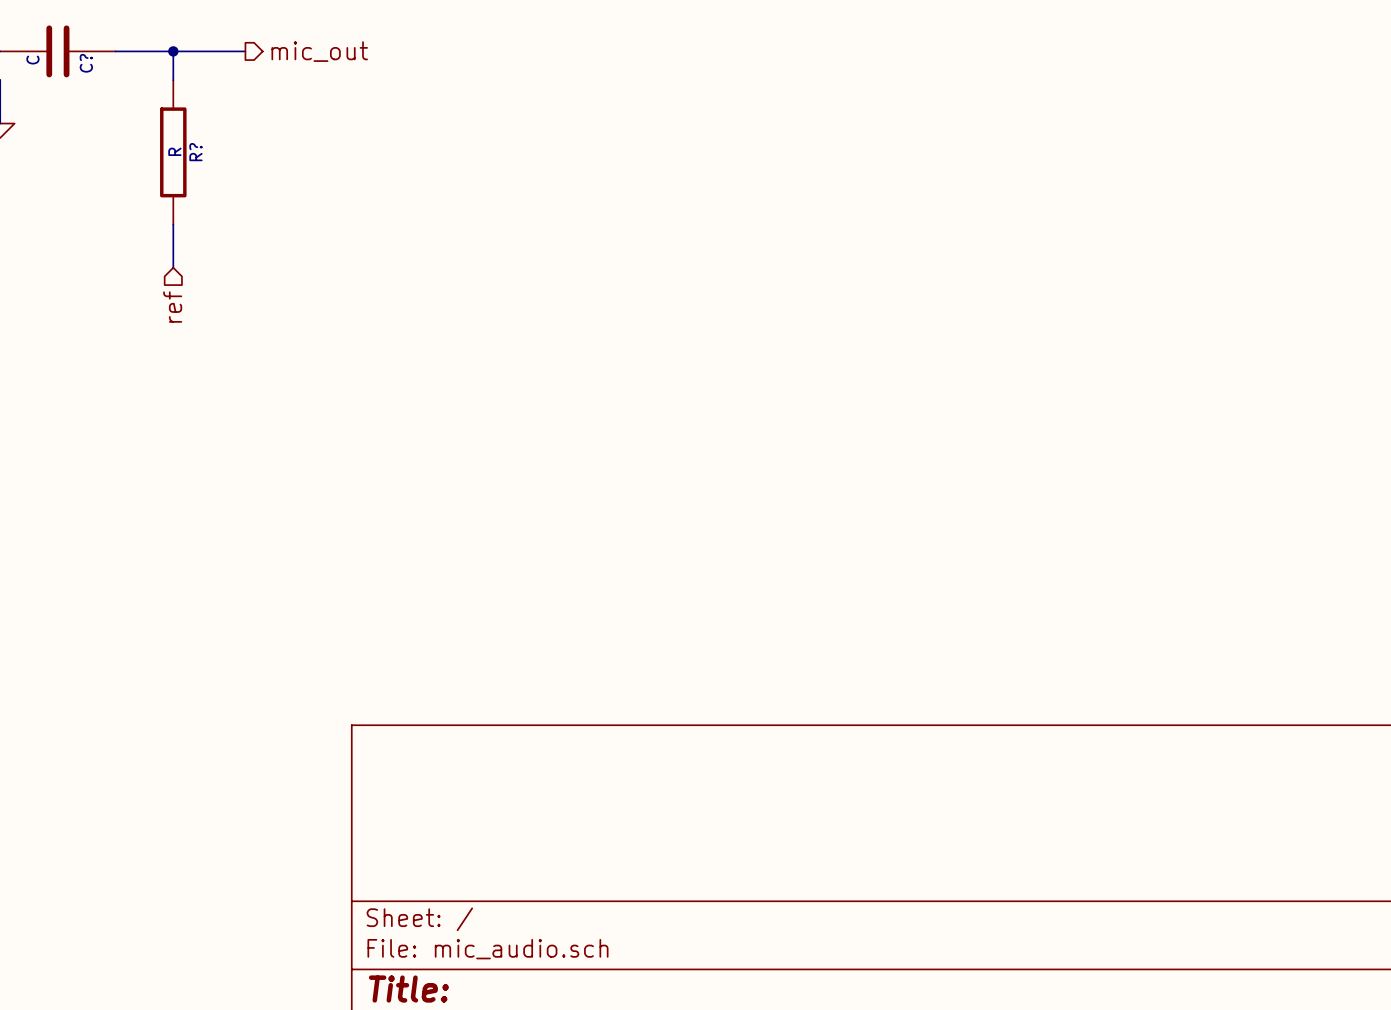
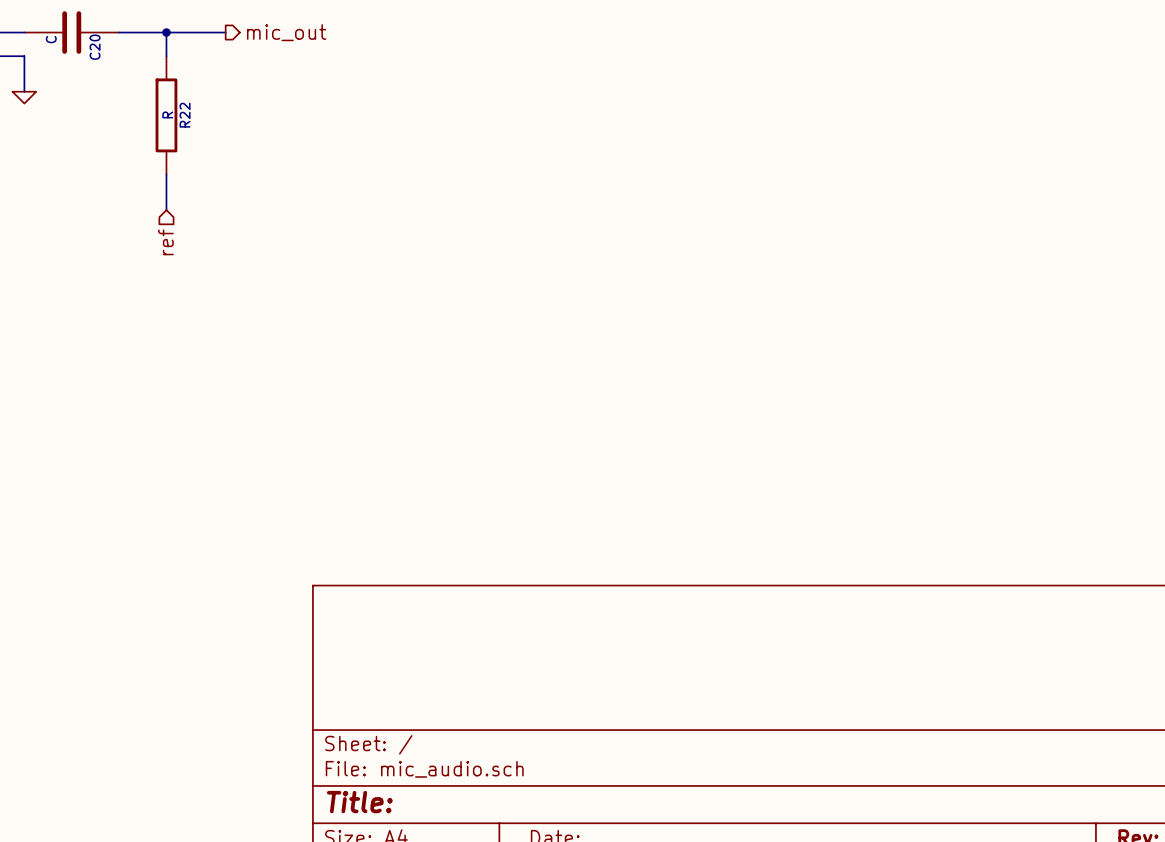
C? name: C? (86, 63) -> C20 (95, 47)
R? name: R? (195, 152) -> R22 (185, 115)

